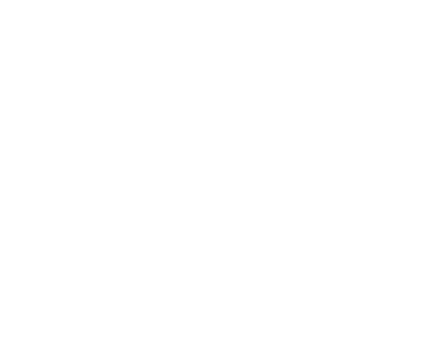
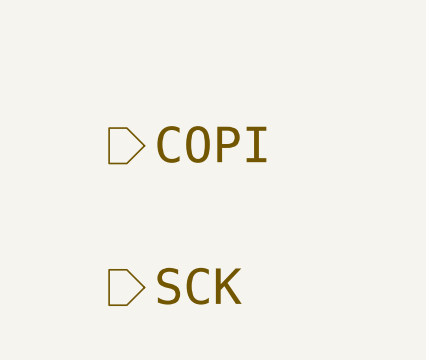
hierarchical label: none -> COPI (211, 144)
hierarchical label: none -> SCK (199, 286)

